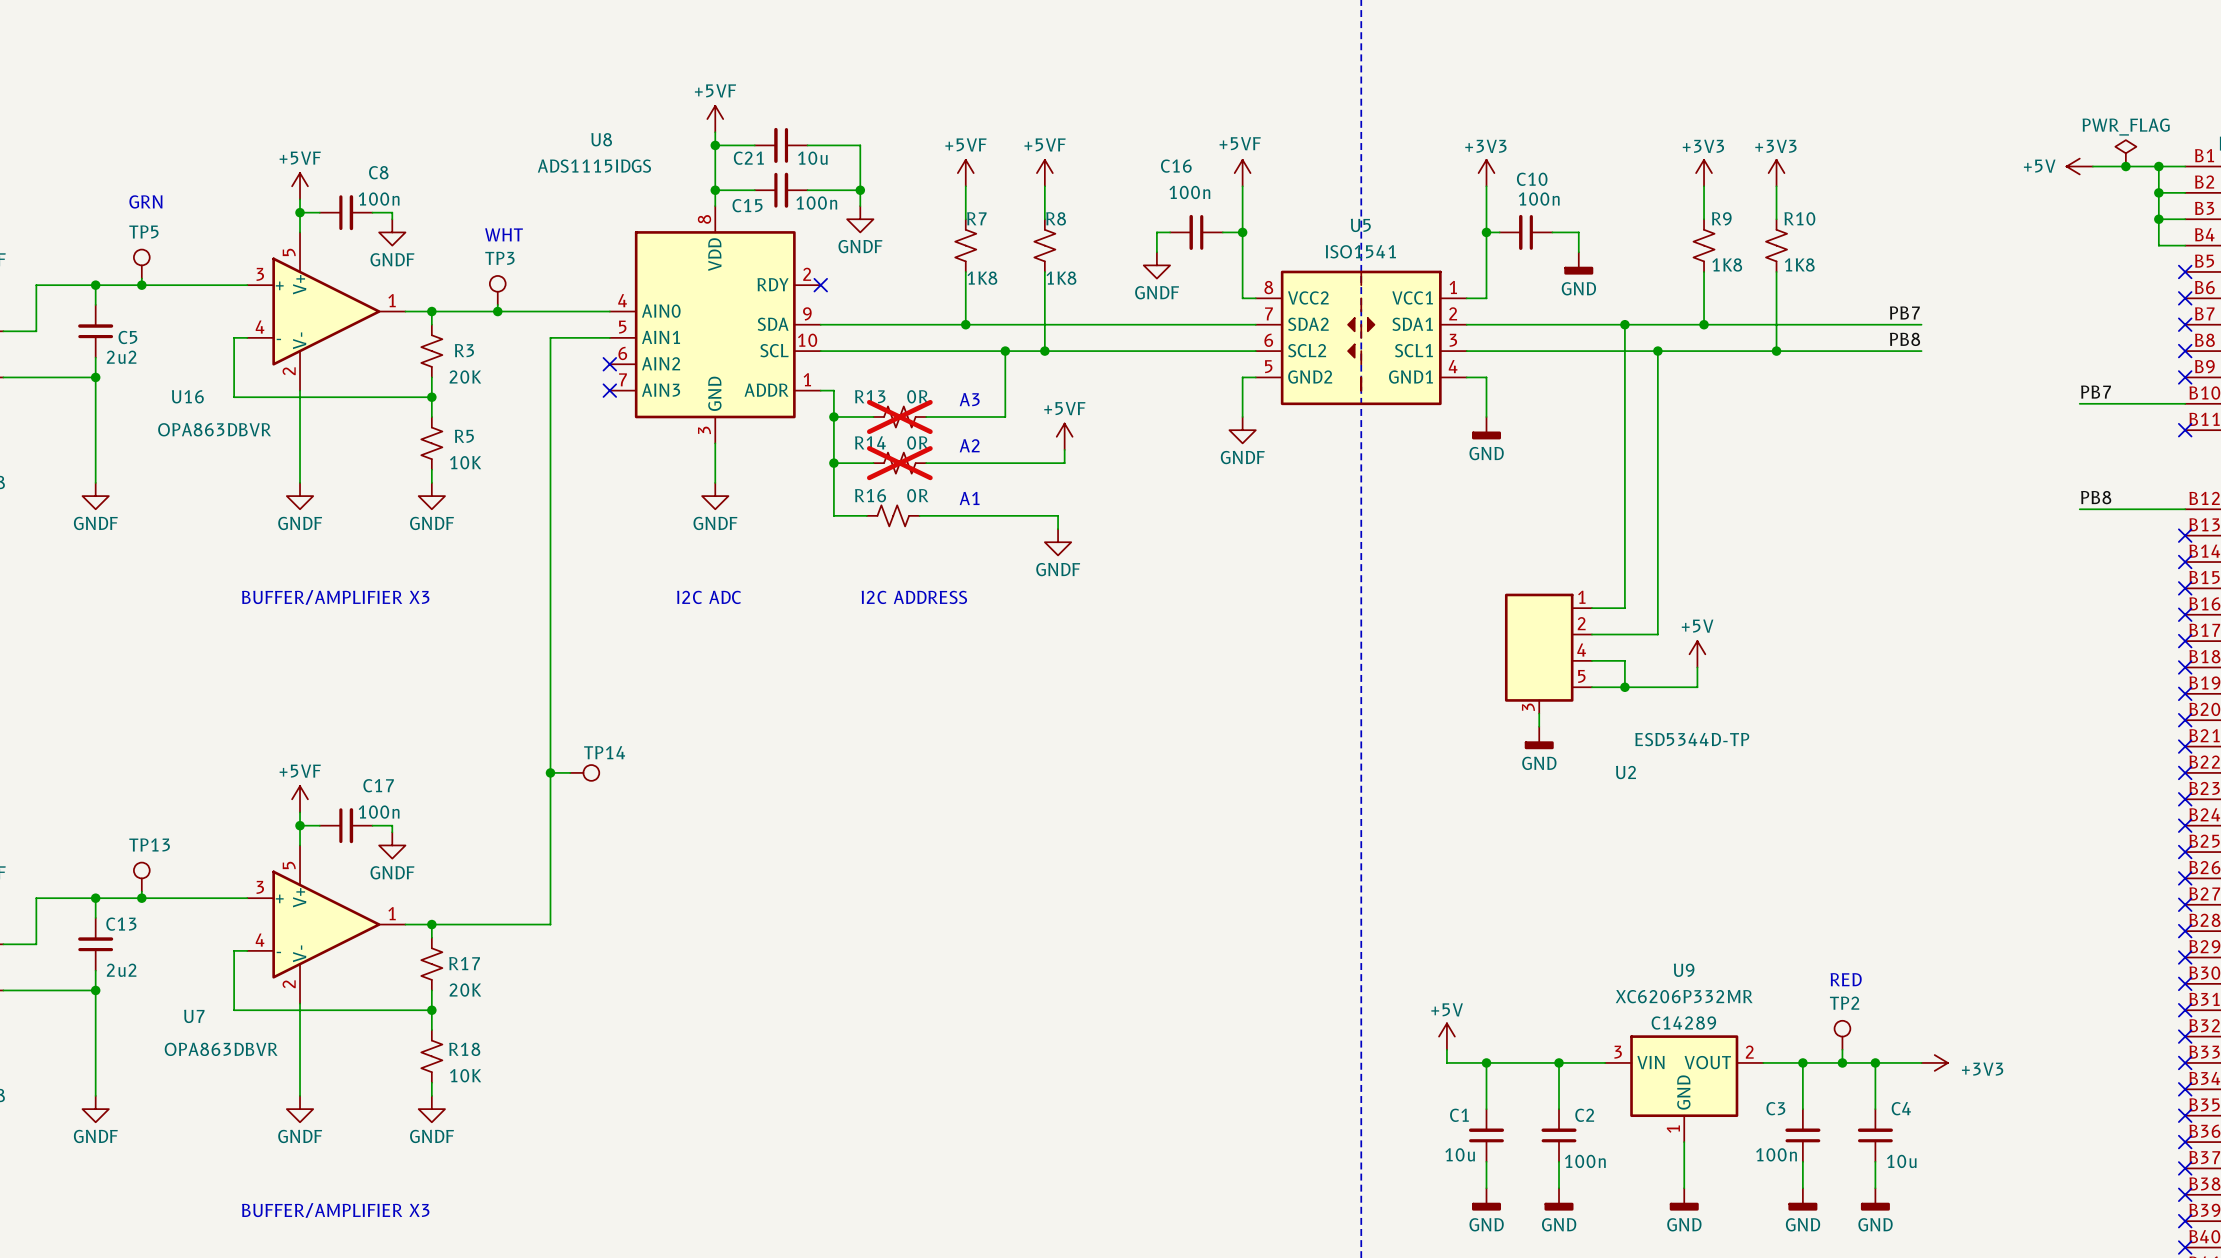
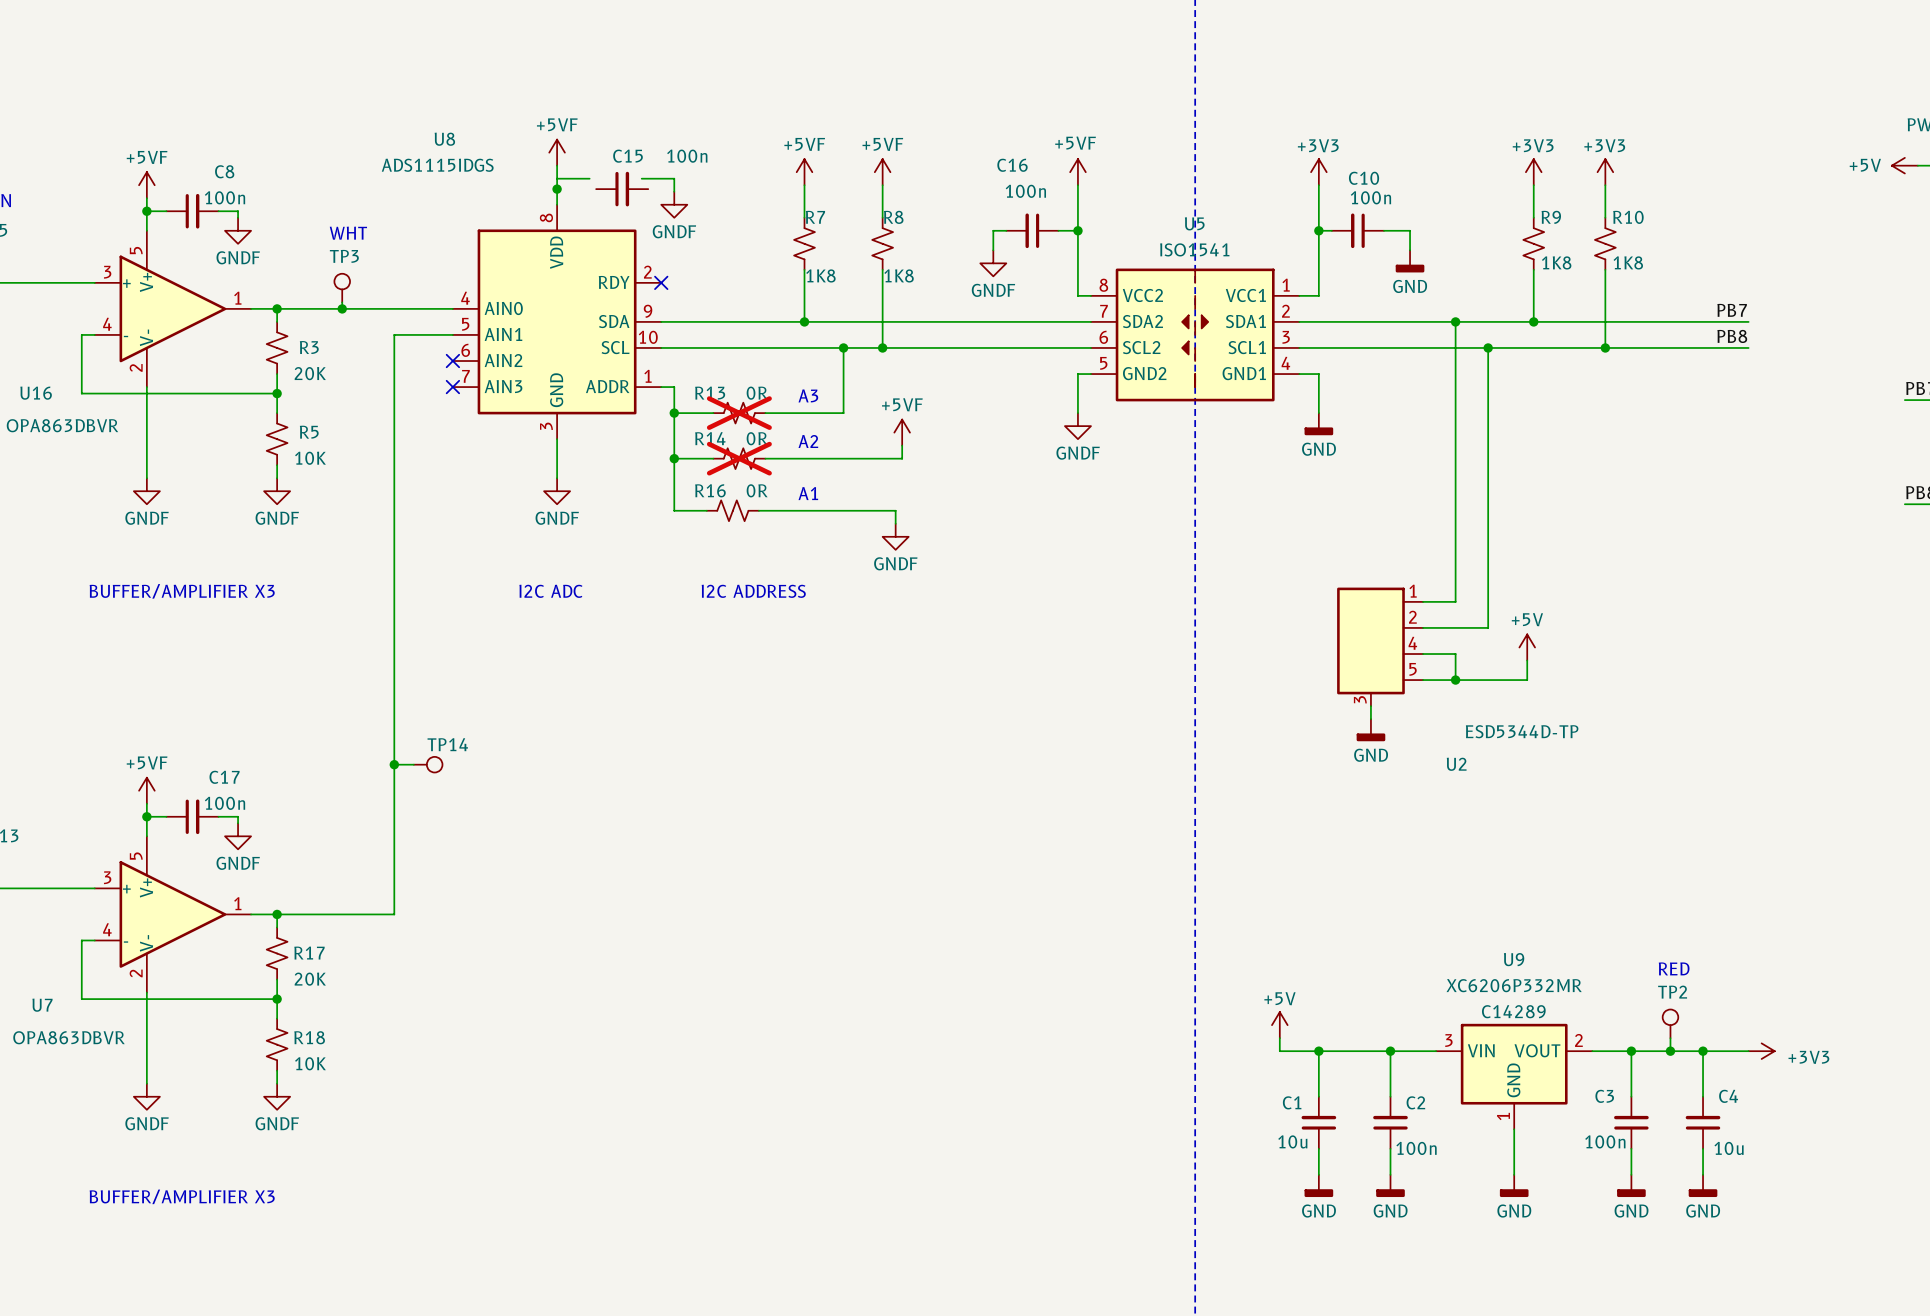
power symbol position: +5VF (715, 119) -> +5VF (557, 152)
wire: (715, 145) (754, 145) -> none
junction: (715, 145) -> none
C21: 10u (781, 145) -> none
wire: (807, 145) (860, 145) (860, 206) -> none
wire: none -> (557, 178) (589, 178)
wire: none -> (641, 178) (674, 178) (674, 191)
wire: (715, 190) (754, 190) -> none
wire: (807, 190) (860, 190) -> none
junction: (860, 190) -> none
C15 value position: 100n (816, 203) -> 100n (687, 156)
C15 name position: C15 (747, 205) -> C15 (628, 156)
power symbol position: GNDF (860, 219) -> GNDF (674, 204)

